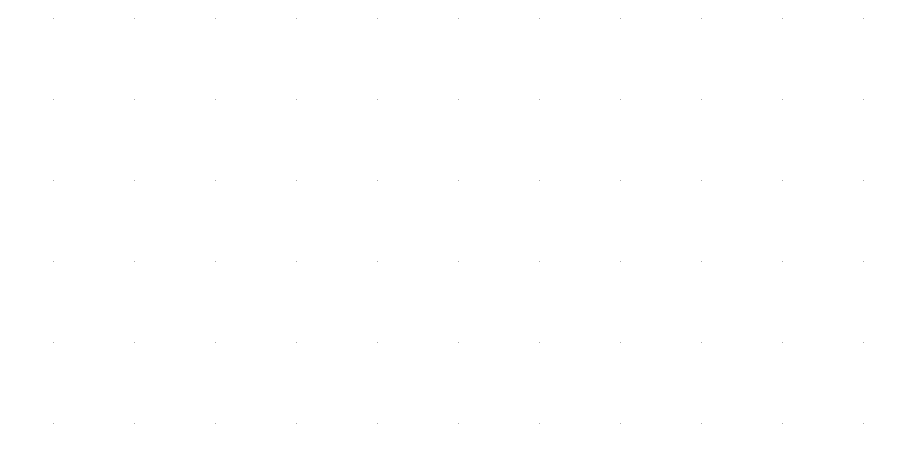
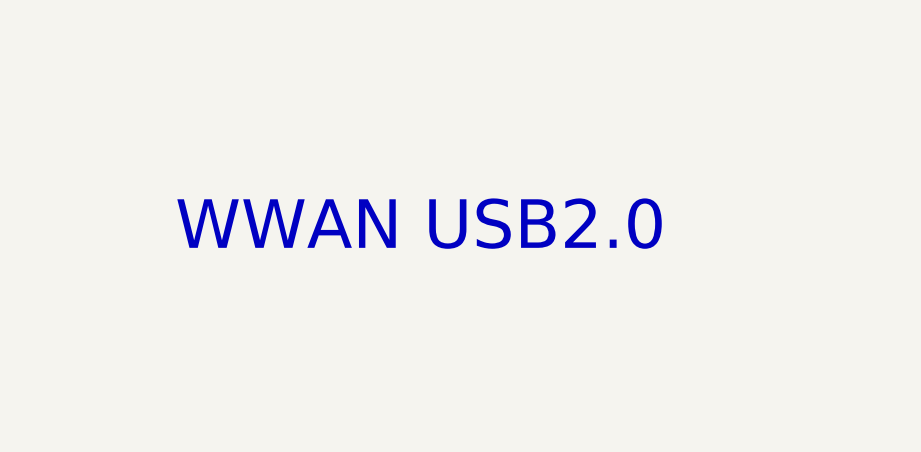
text: none -> WWAN USB2.0 (419, 223)

